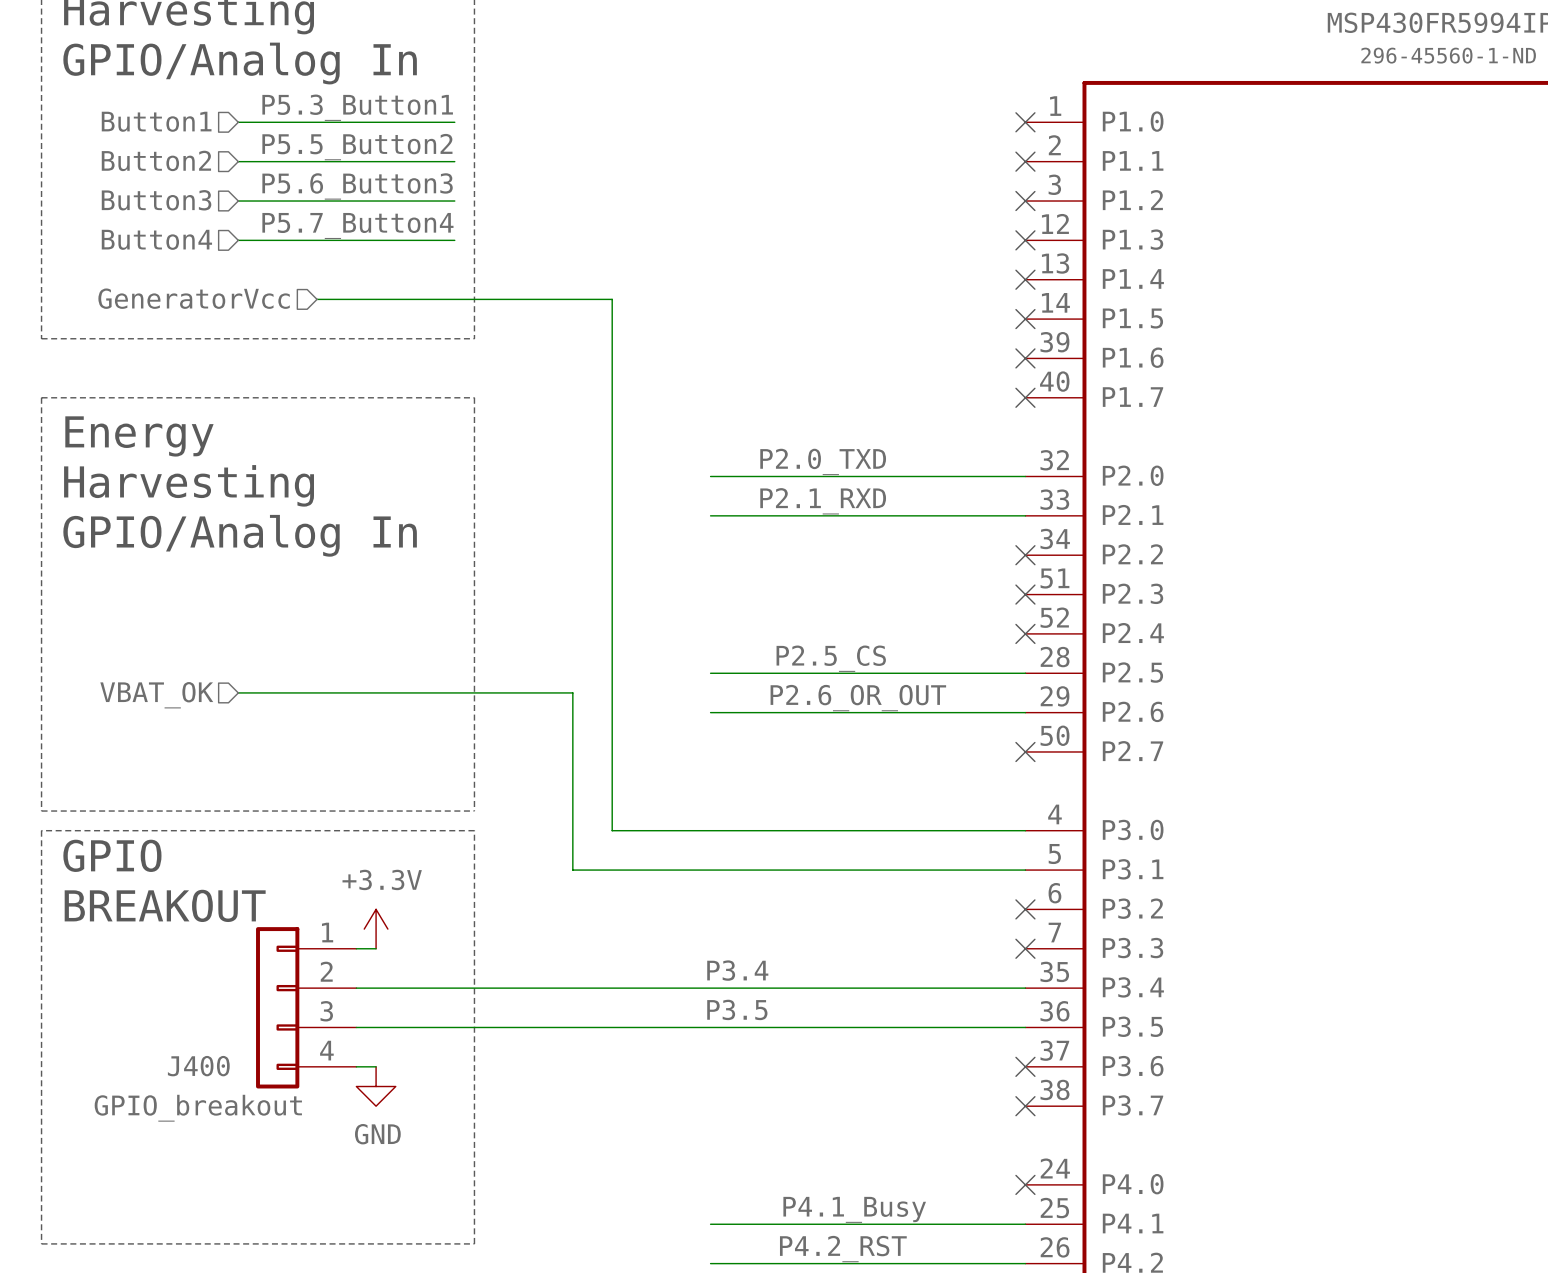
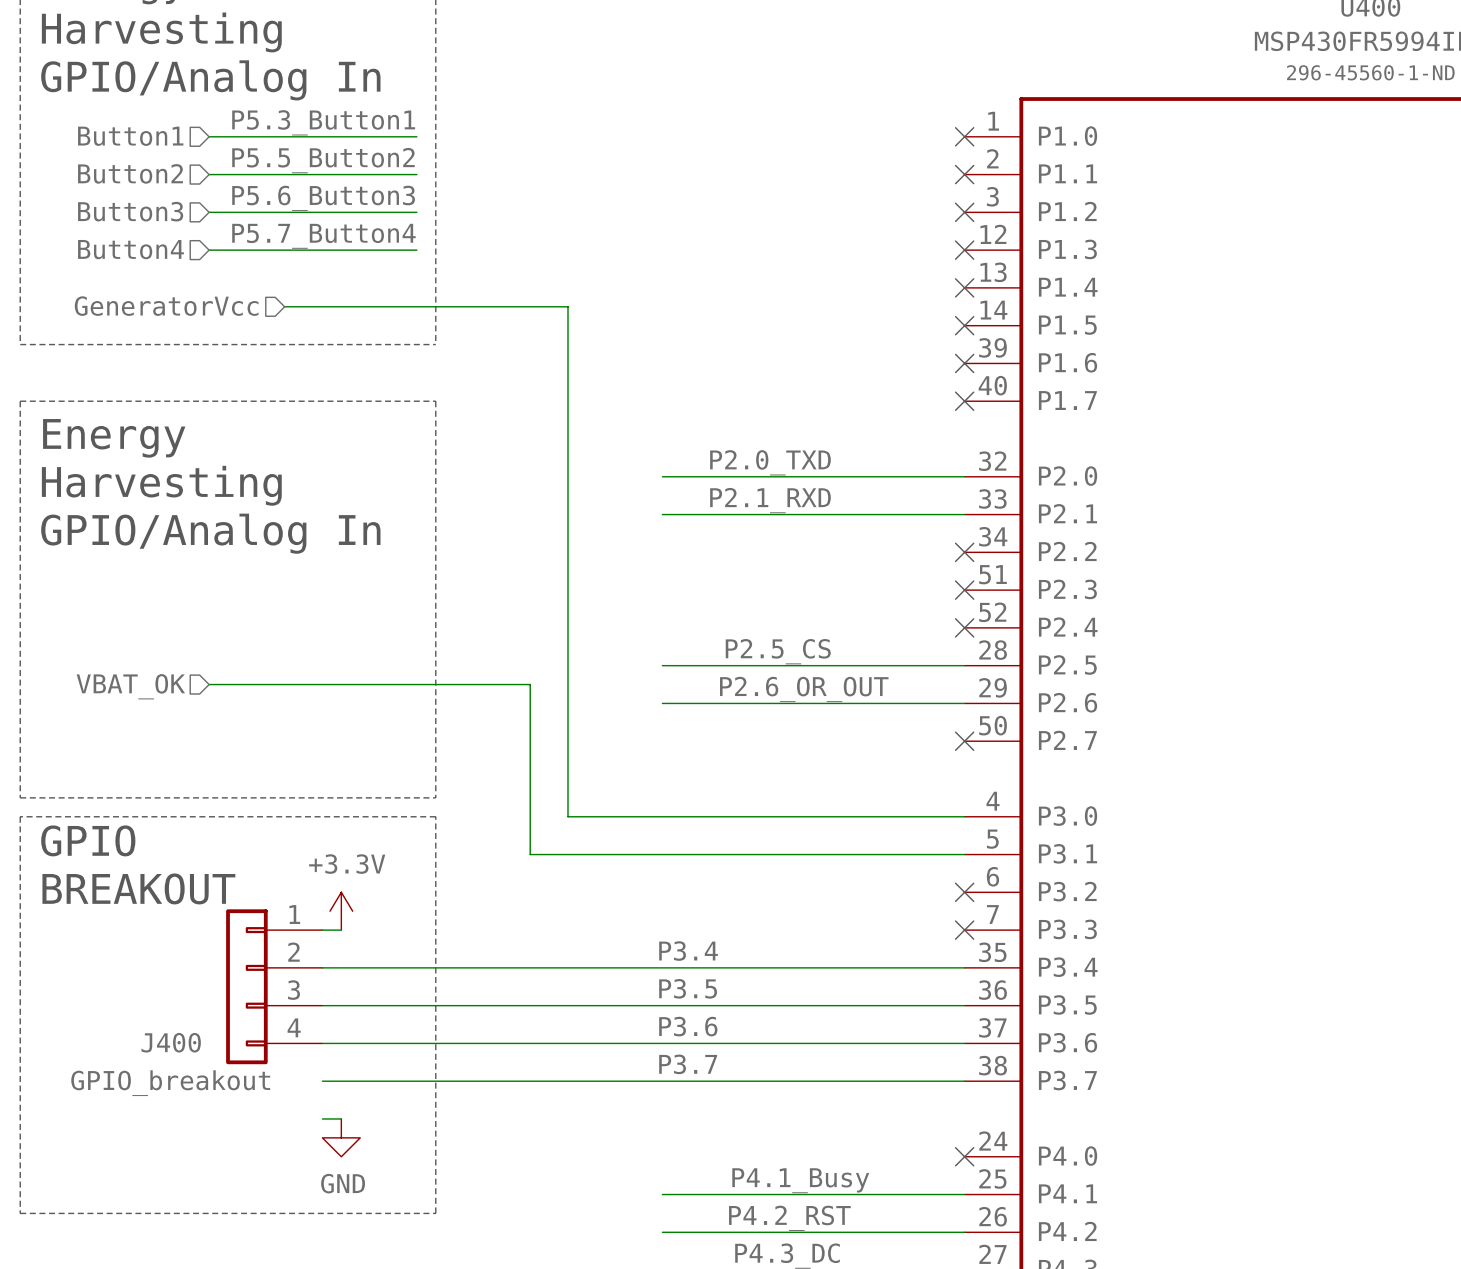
label: none -> P3.6 (688, 1026)
wire: none -> (341, 1043) (964, 1043)
no-connect mark: (1025, 1066) -> none
power symbol position: GND (376, 1086) -> GND (341, 1137)
label: none -> P3.7 (688, 1064)
wire: none -> (322, 1081) (964, 1081)
no-connect mark: (1025, 1106) -> none
wire: none -> (322, 1118) (341, 1118)

